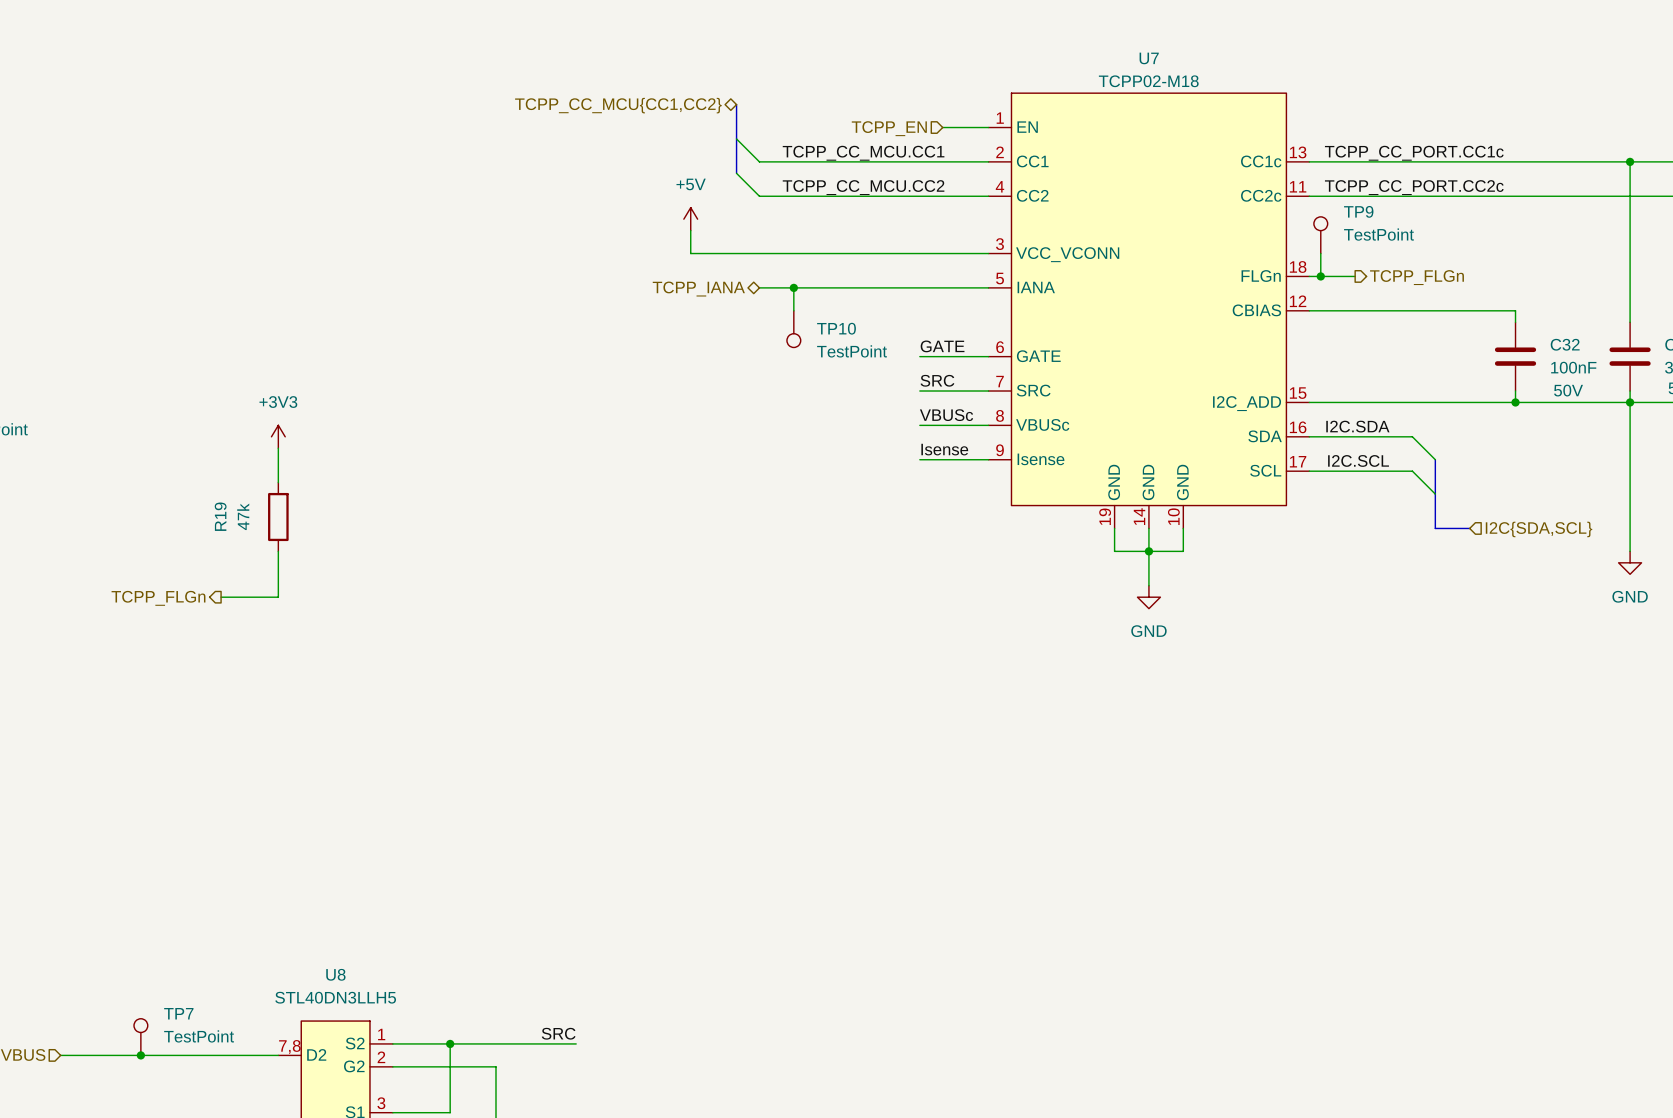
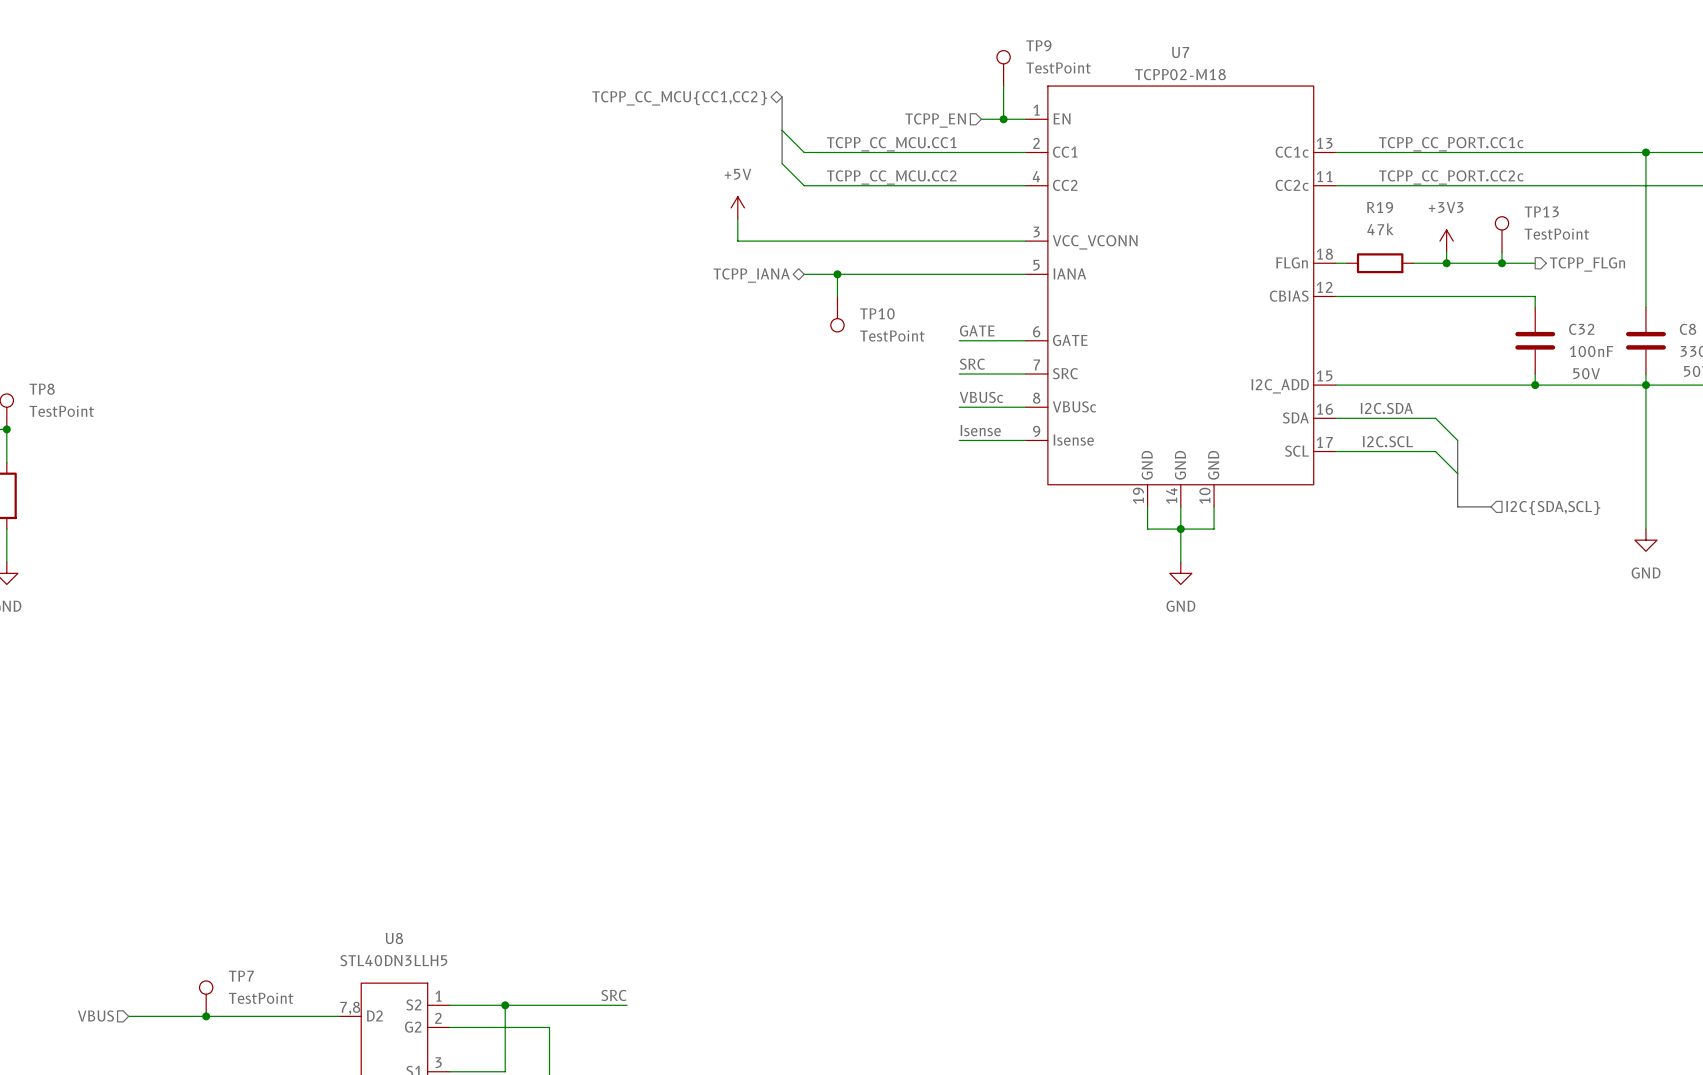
wire: none -> (1003, 86) (1003, 119)
junction: none -> (1003, 119)
TP9 position: (1320, 235) -> (1003, 68)
TP13: none -> TestPoint (1501, 234)
wire: (1320, 253) (1320, 276) (1355, 276) -> none
power symbol: none -> +3V3 (1446, 241)
wire: none -> (1446, 252) (1446, 263)
wire: none -> (1501, 252) (1501, 263)
junction: (1320, 276) -> none
wire: none -> (1413, 263) (1535, 263)
junction: none -> (1446, 263)
junction: none -> (1501, 263)
hierarchical label position: TCPP_FLGn (1416, 277) -> TCPP_FLGn (1587, 264)
power symbol: +3V3 (278, 436) -> none
wire: (278, 448) (278, 482) -> none
R19 rotation: 0° (278, 517) -> 90° clockwise (1380, 263)
R19 position: (278, 517) -> (1380, 263)
wire: (278, 551) (278, 597) (221, 597) -> none
hierarchical label: TCPP_FLGn (158, 598) -> none

